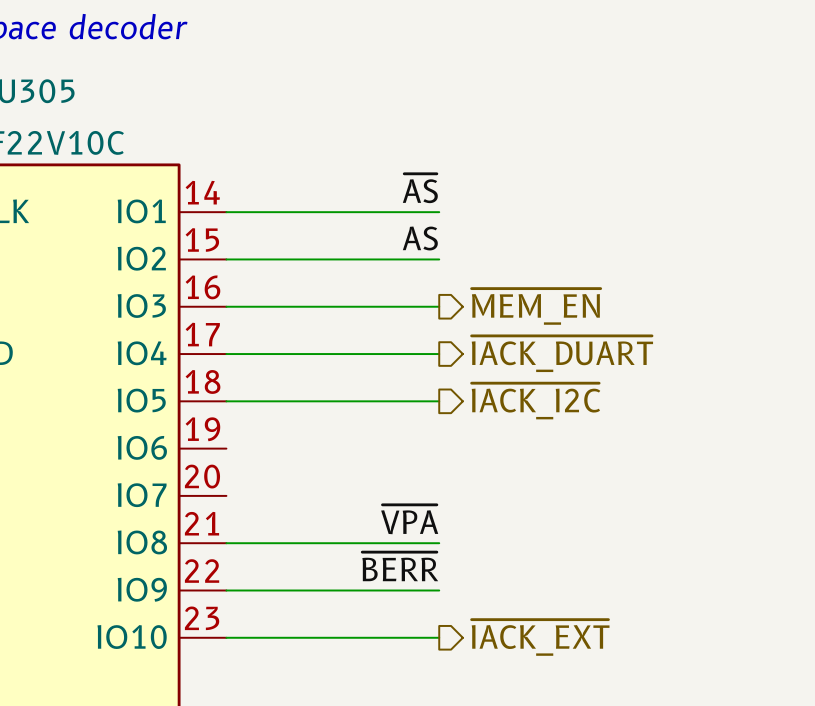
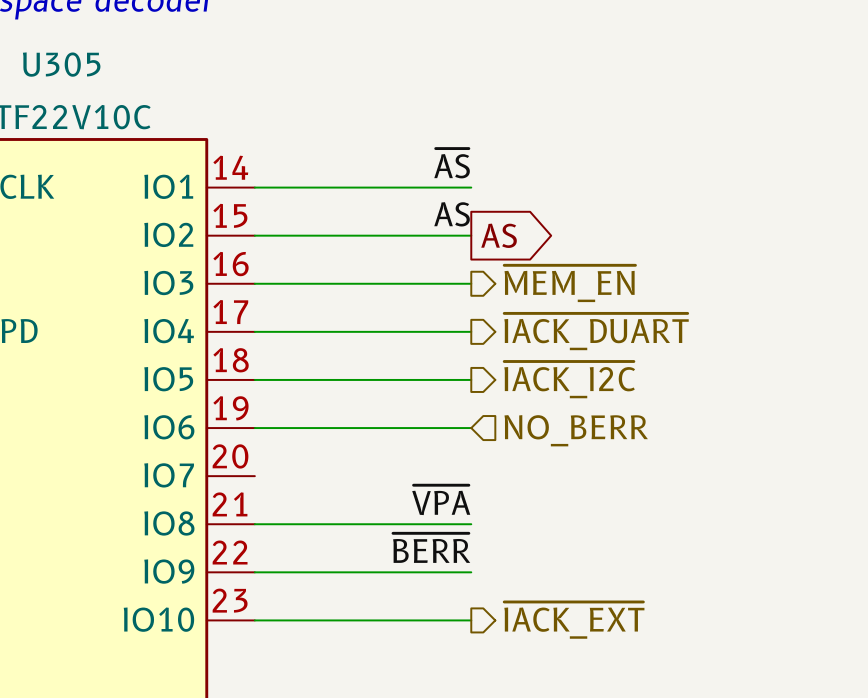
global label: none -> AS (499, 235)
wire: none -> (254, 428) (471, 428)
hierarchical label: none -> NO_BERR (576, 430)

